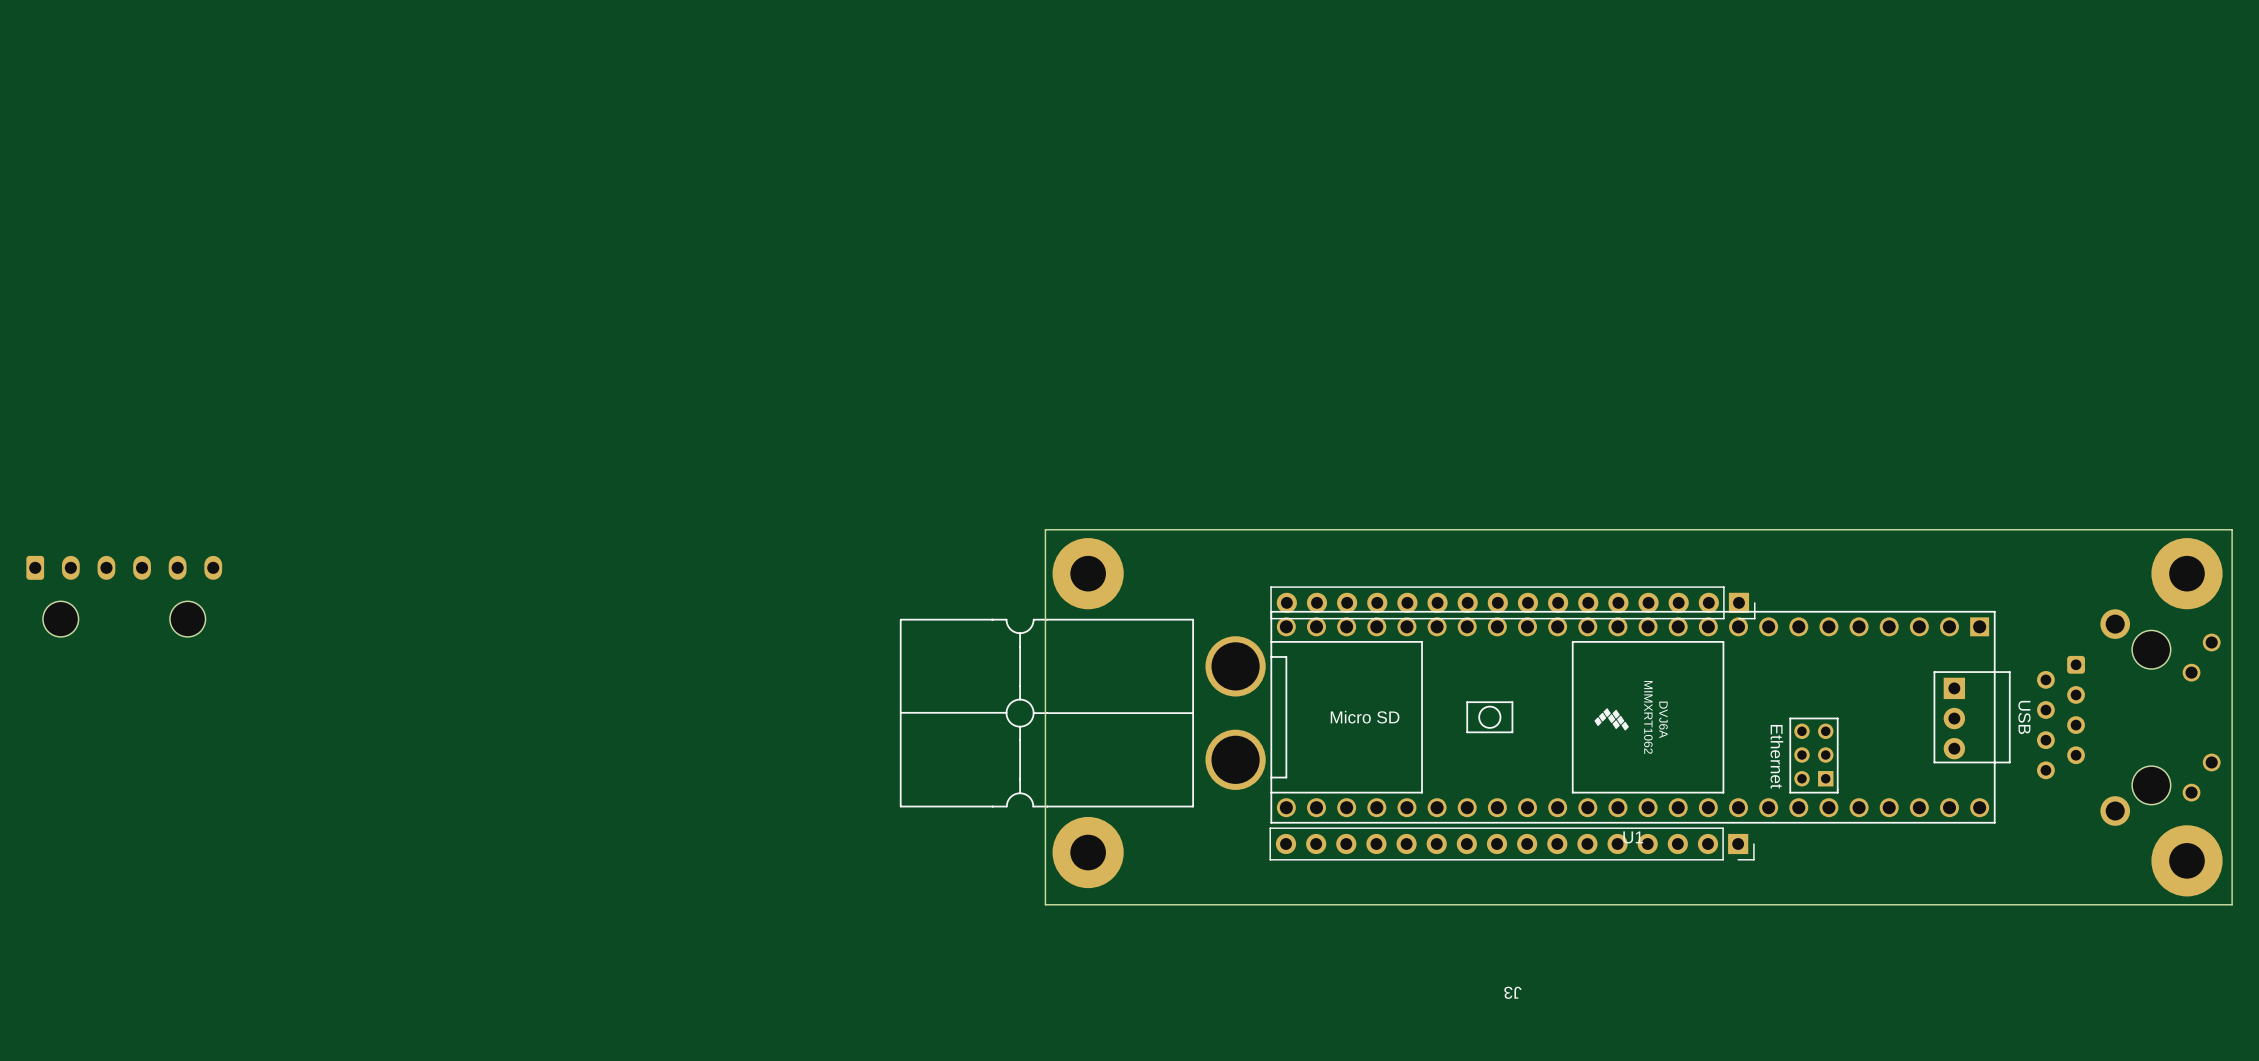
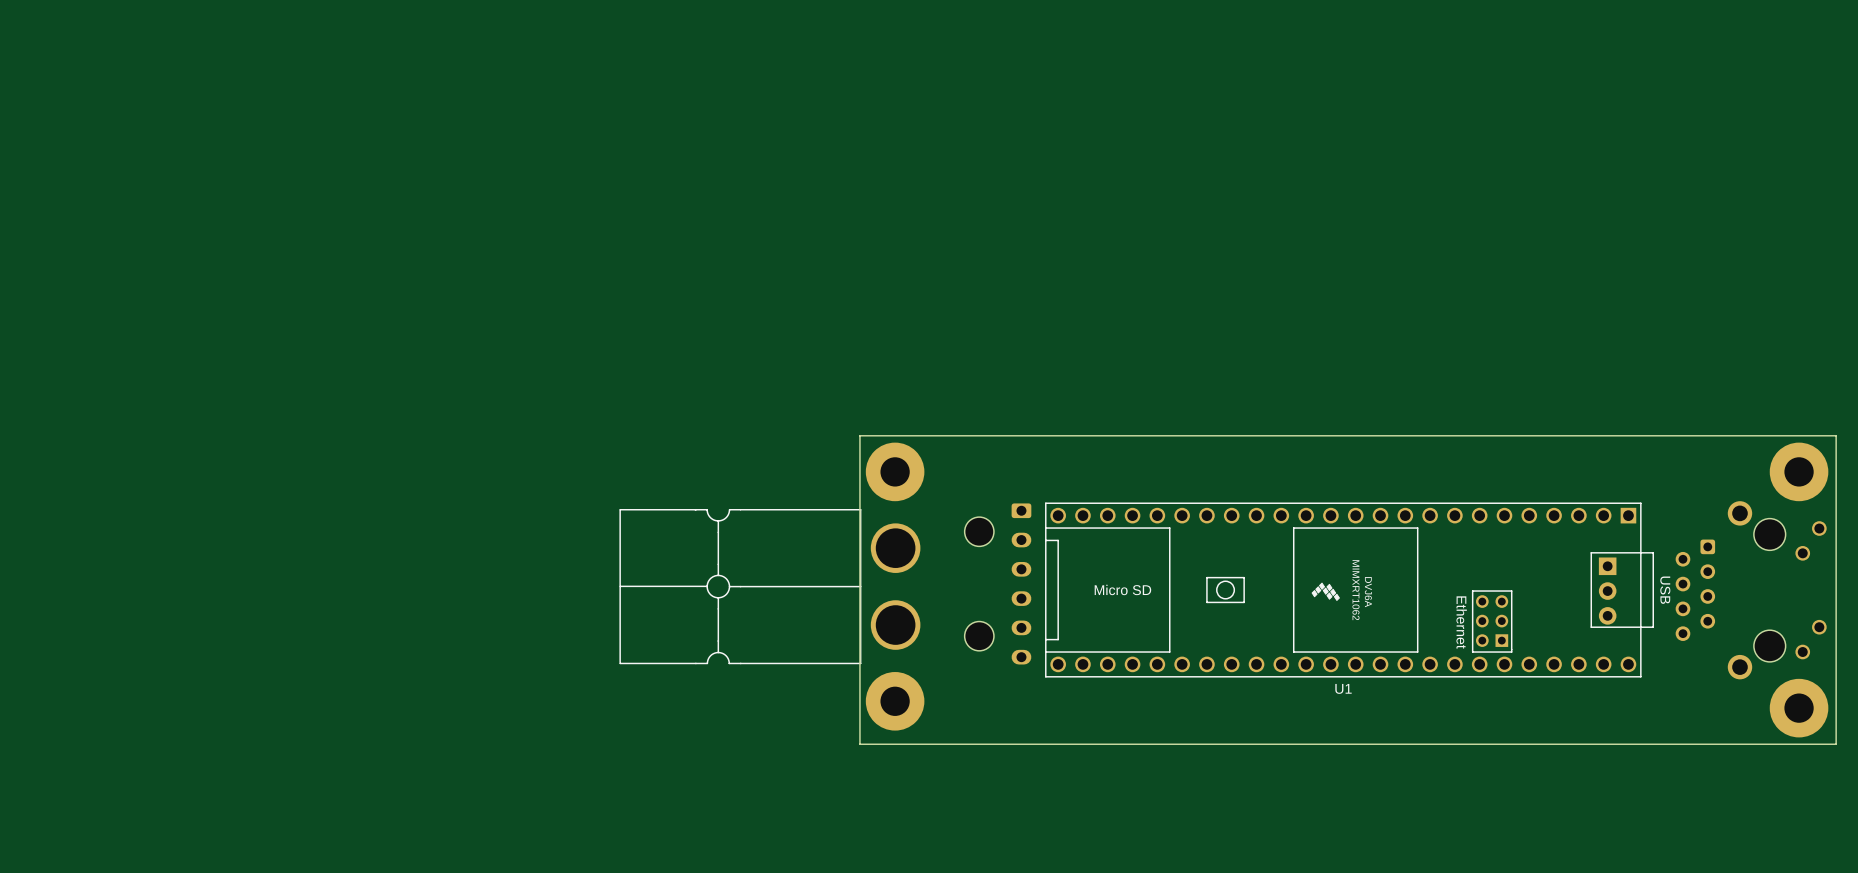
part: (124, 596) -> none
part: none -> (997, 583)
part position: (1082, 713) -> (769, 586)
J3: (1512, 723) -> none

